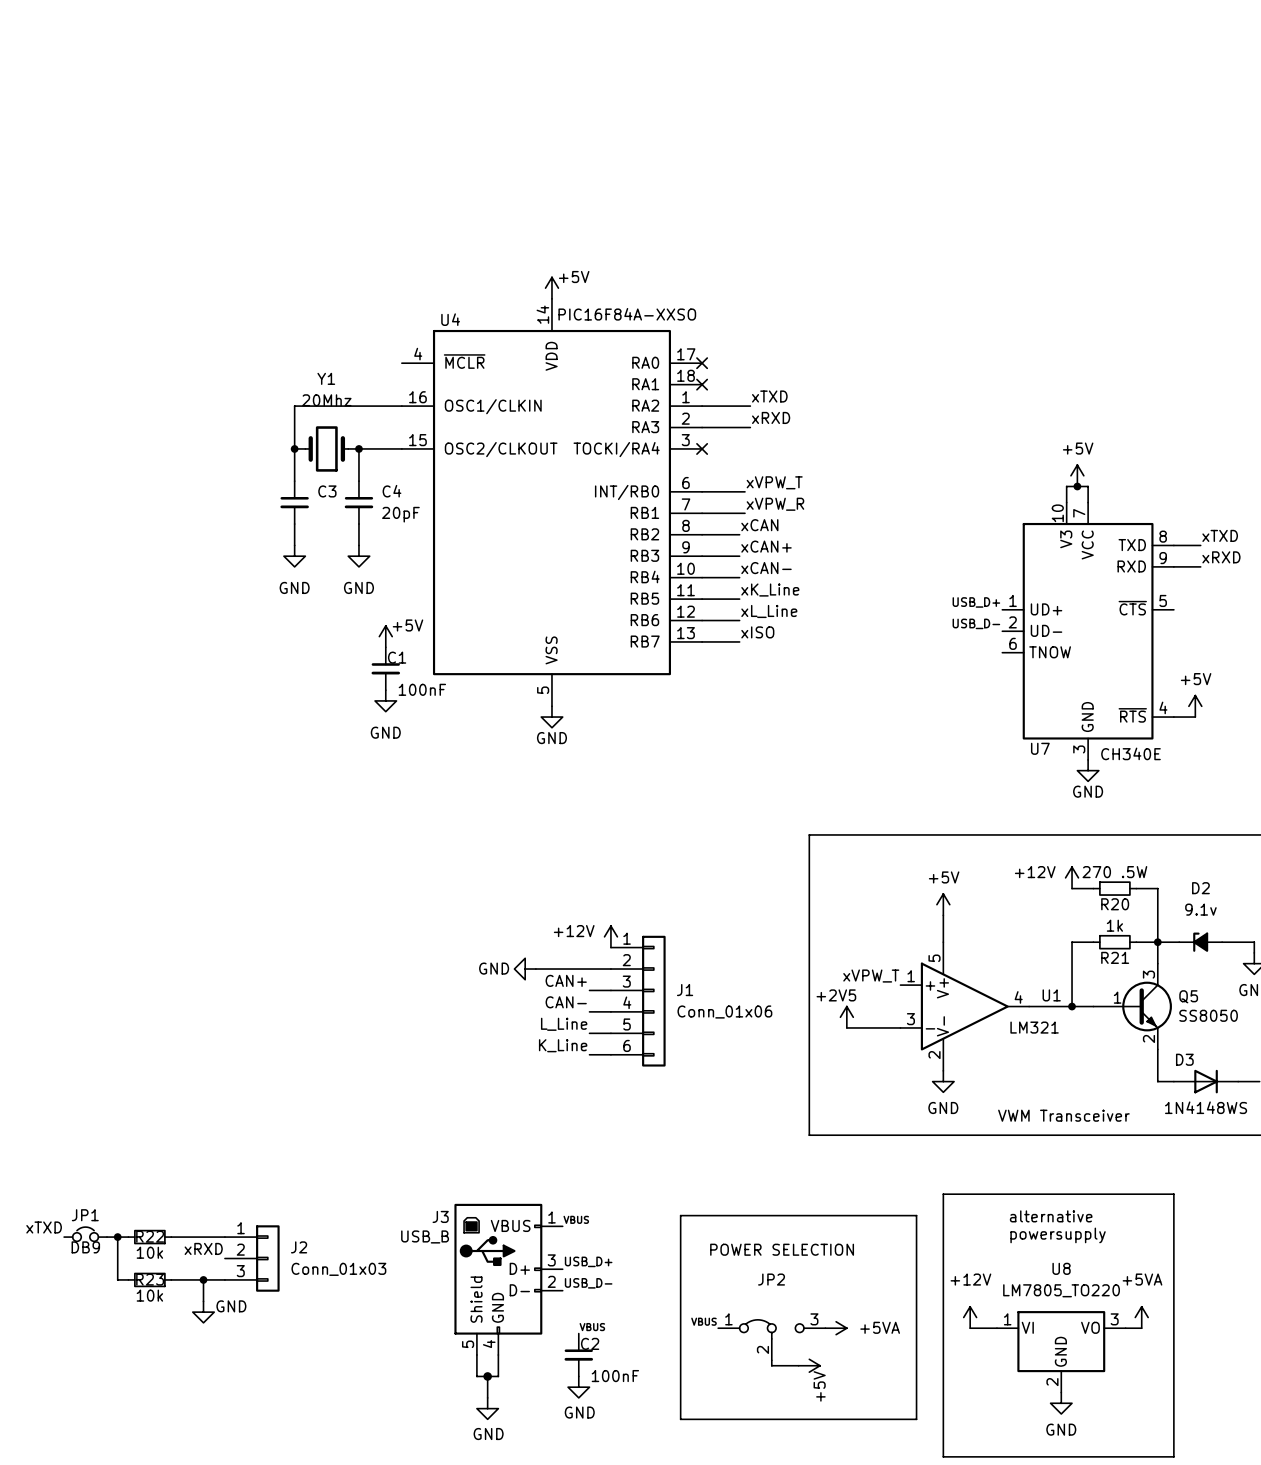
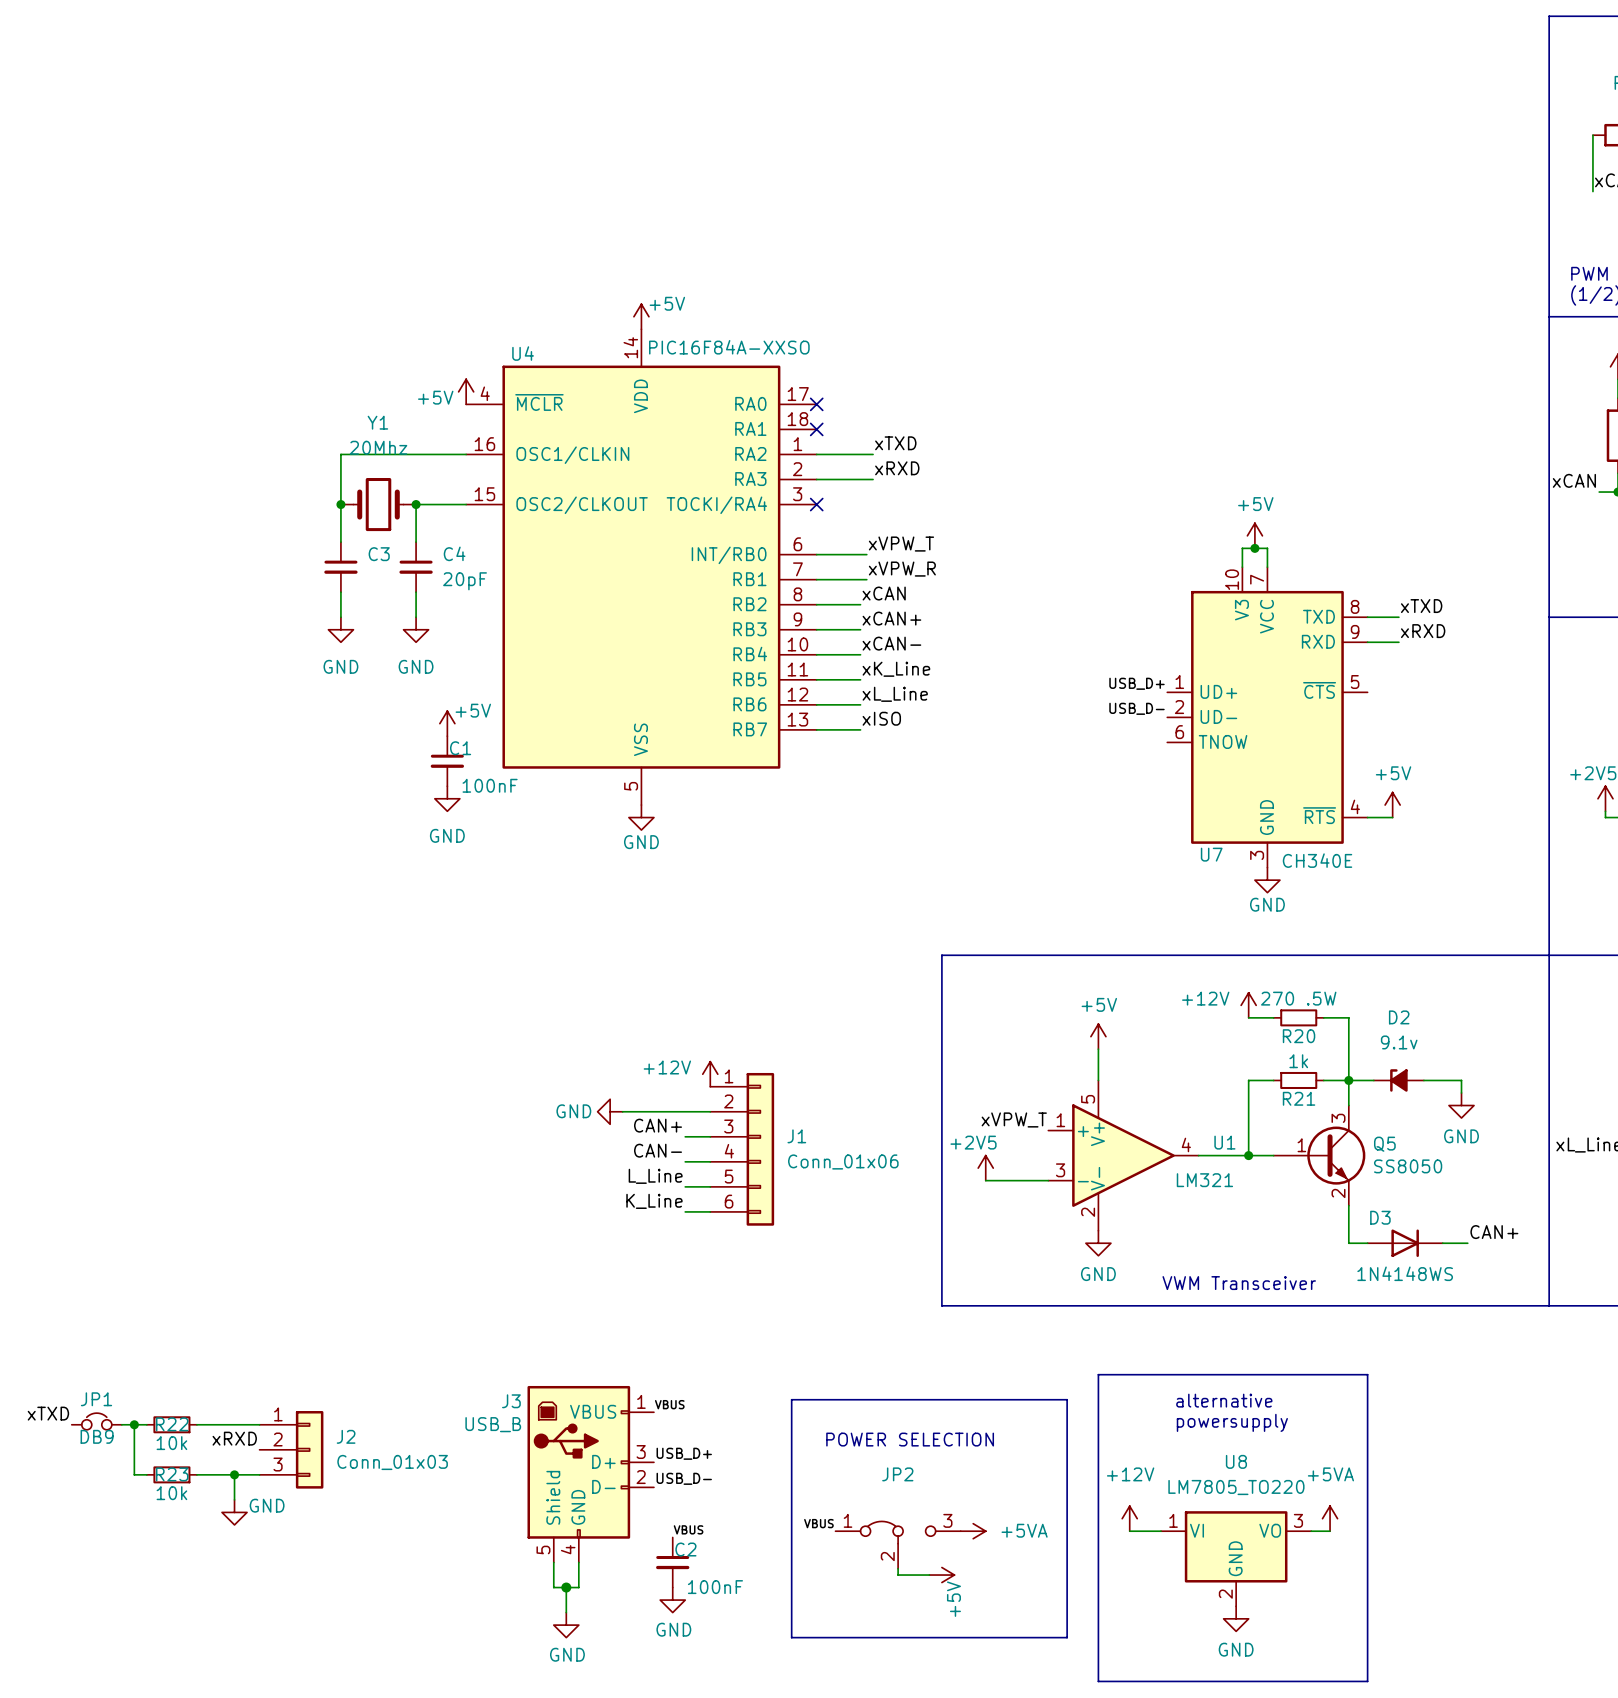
power symbol: none -> +5V (466, 391)

